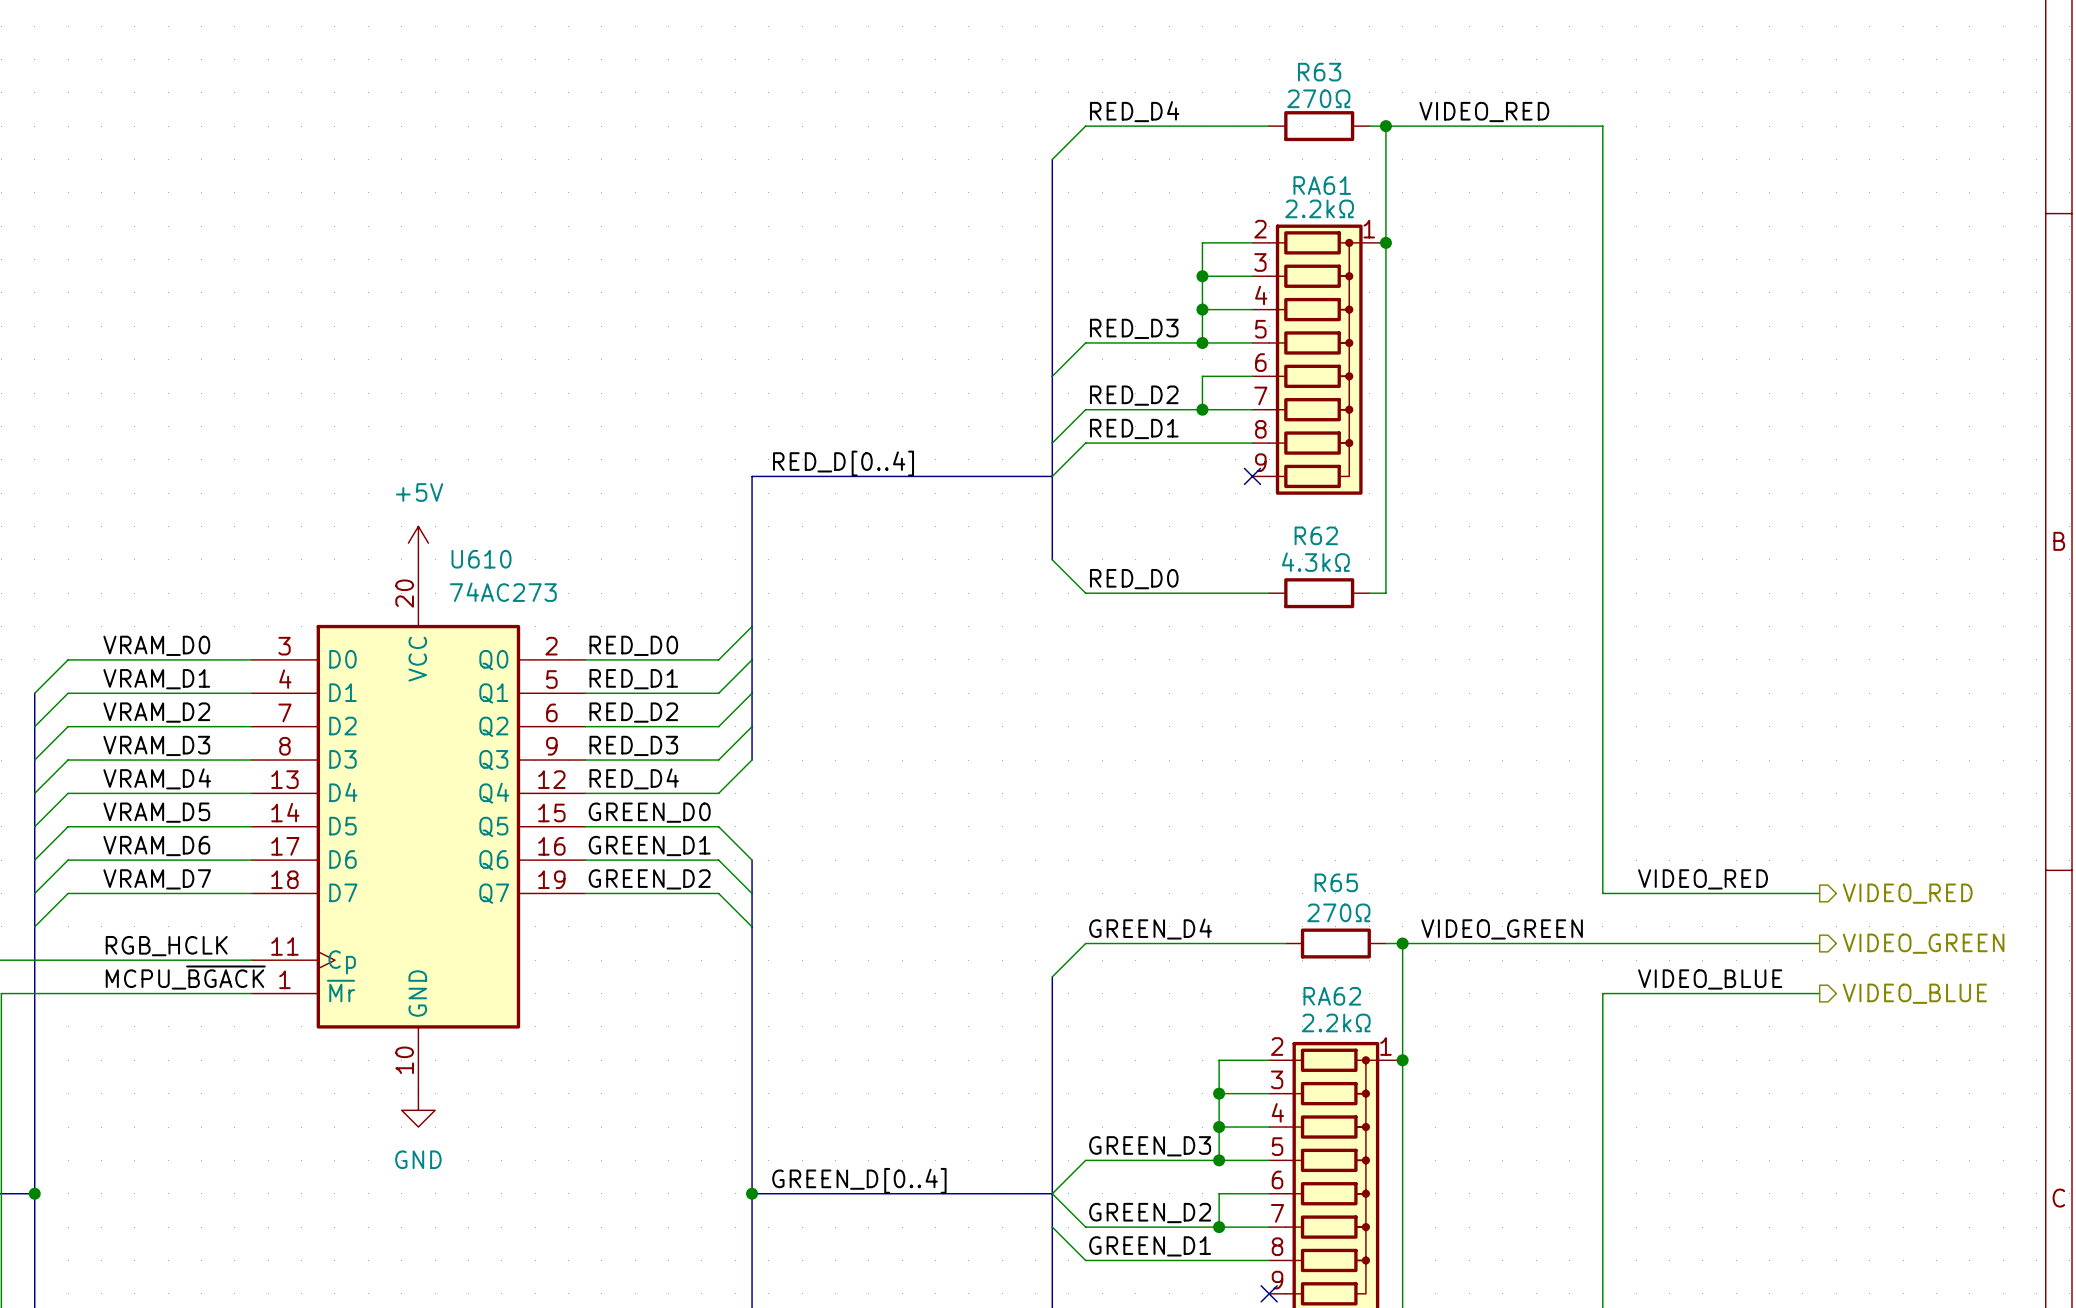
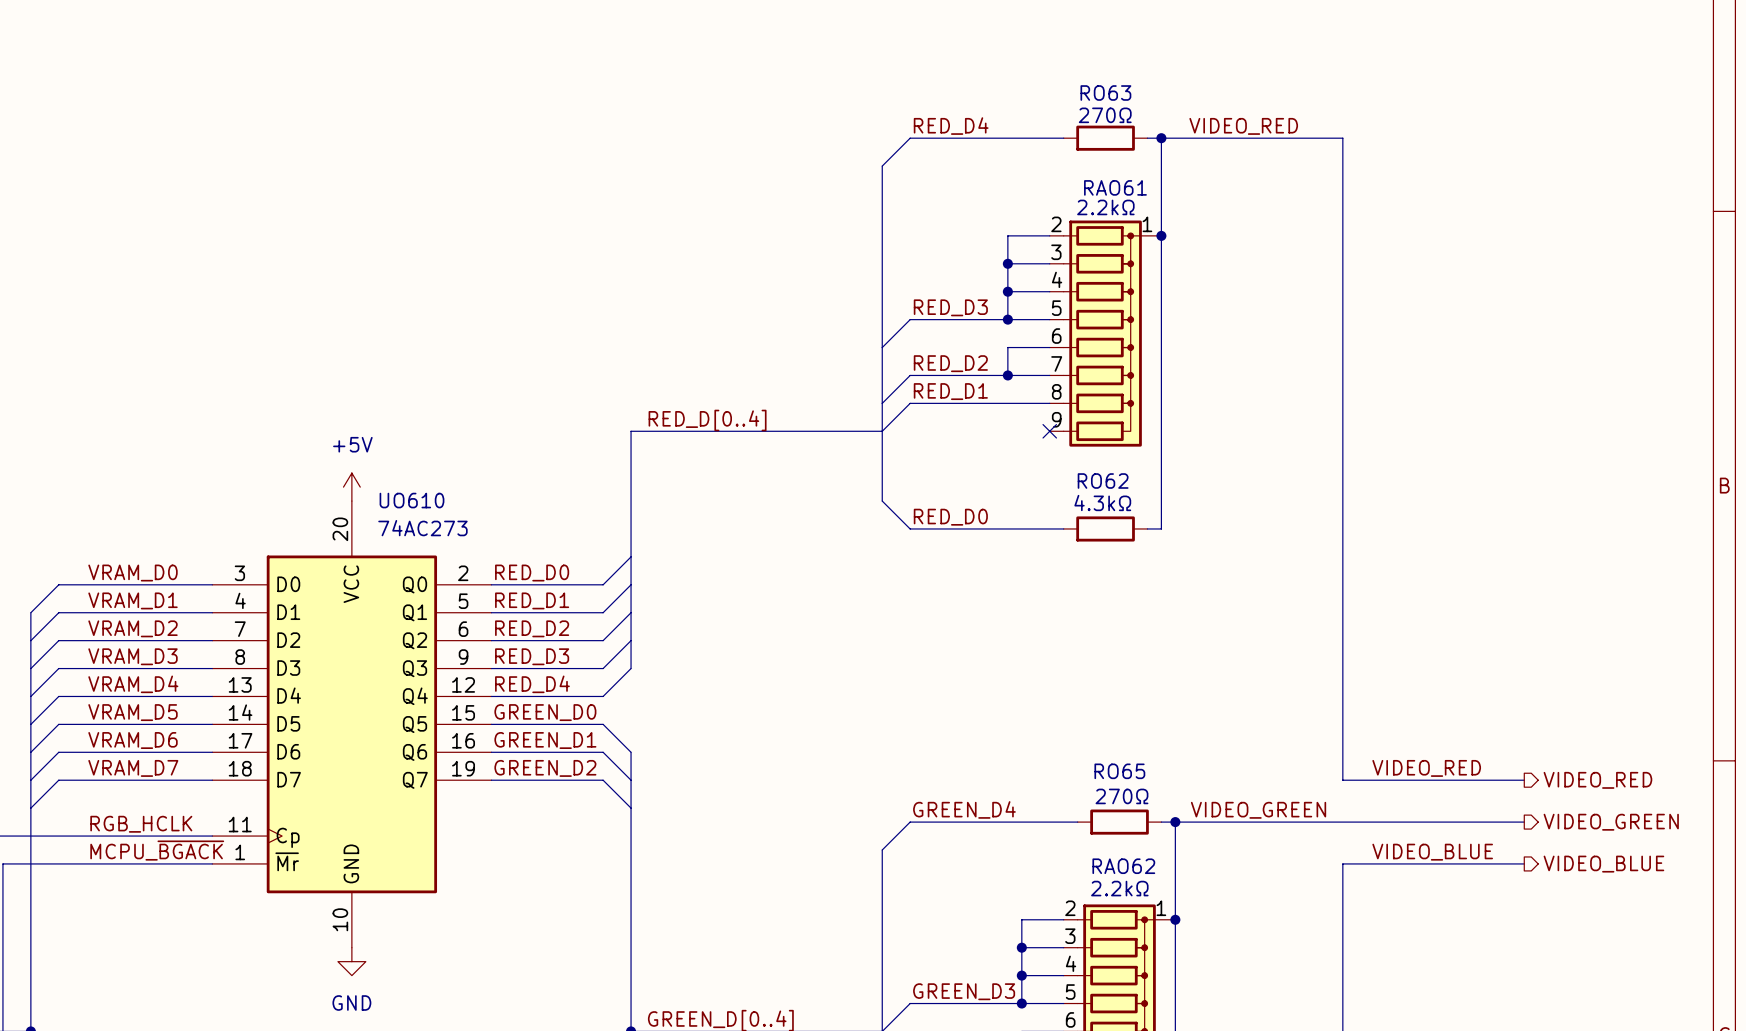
R63 name: R63 (1319, 72) -> RO63 (1105, 93)
RA61 name: RA61 (1322, 185) -> RAO61 (1115, 187)
R62 name: R62 (1316, 535) -> RO62 (1103, 481)
U610 name: U610 (481, 559) -> UO610 (411, 500)
R65 name: R65 (1336, 882) -> RO65 (1119, 771)
RA62 name: RA62 (1332, 996) -> RAO62 (1123, 866)

